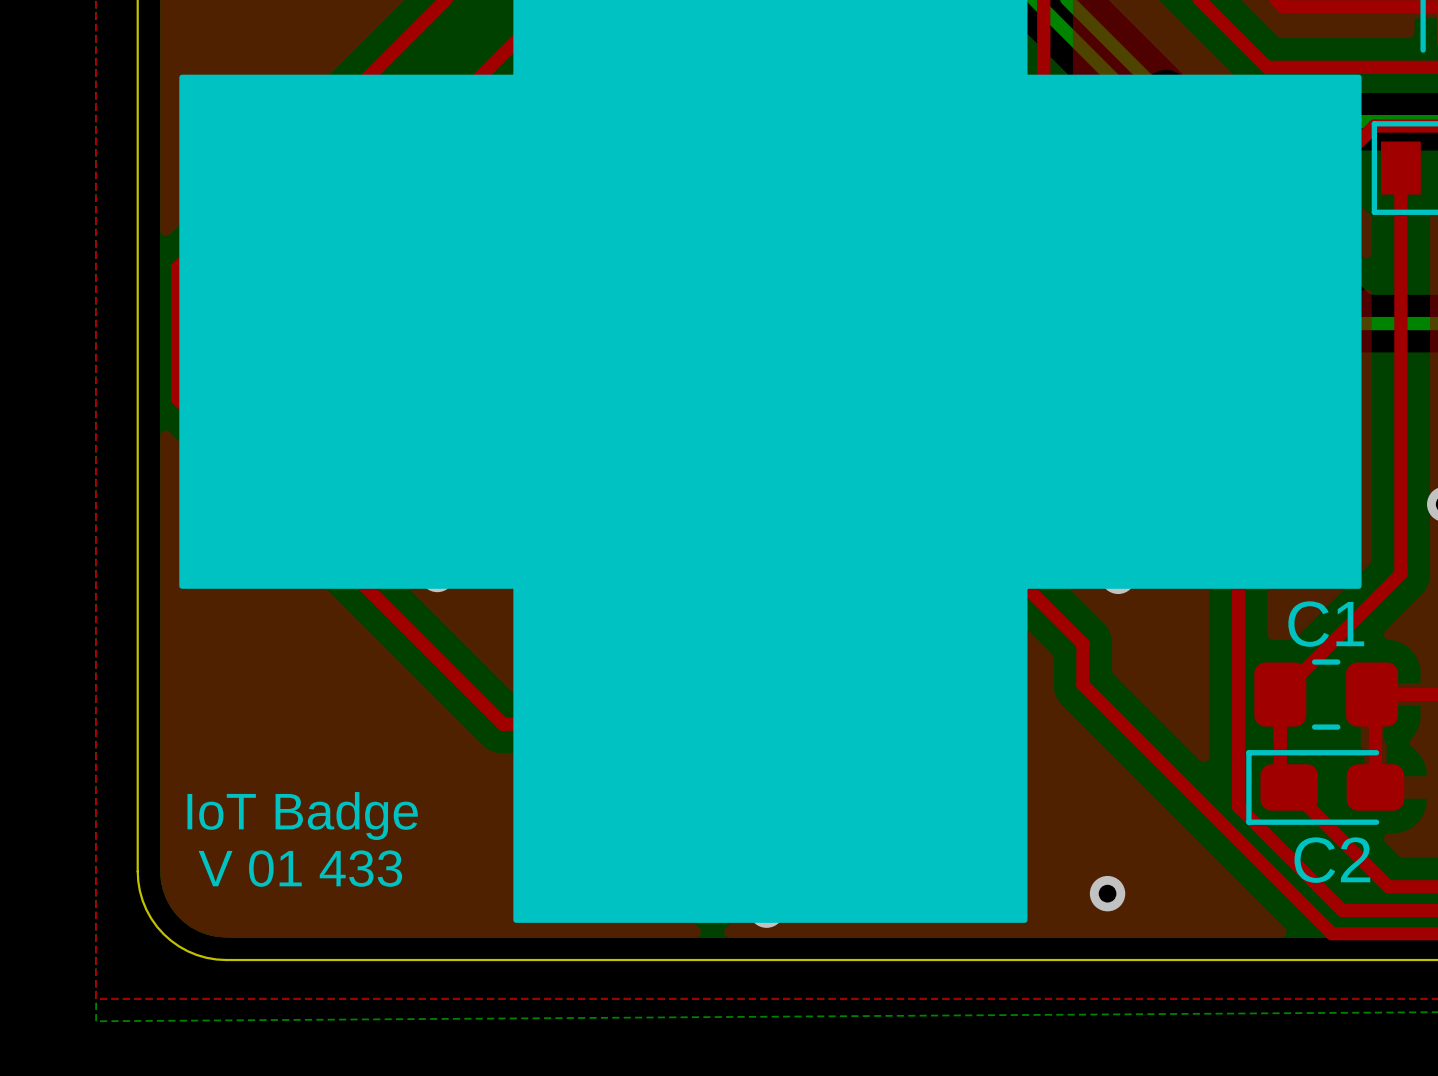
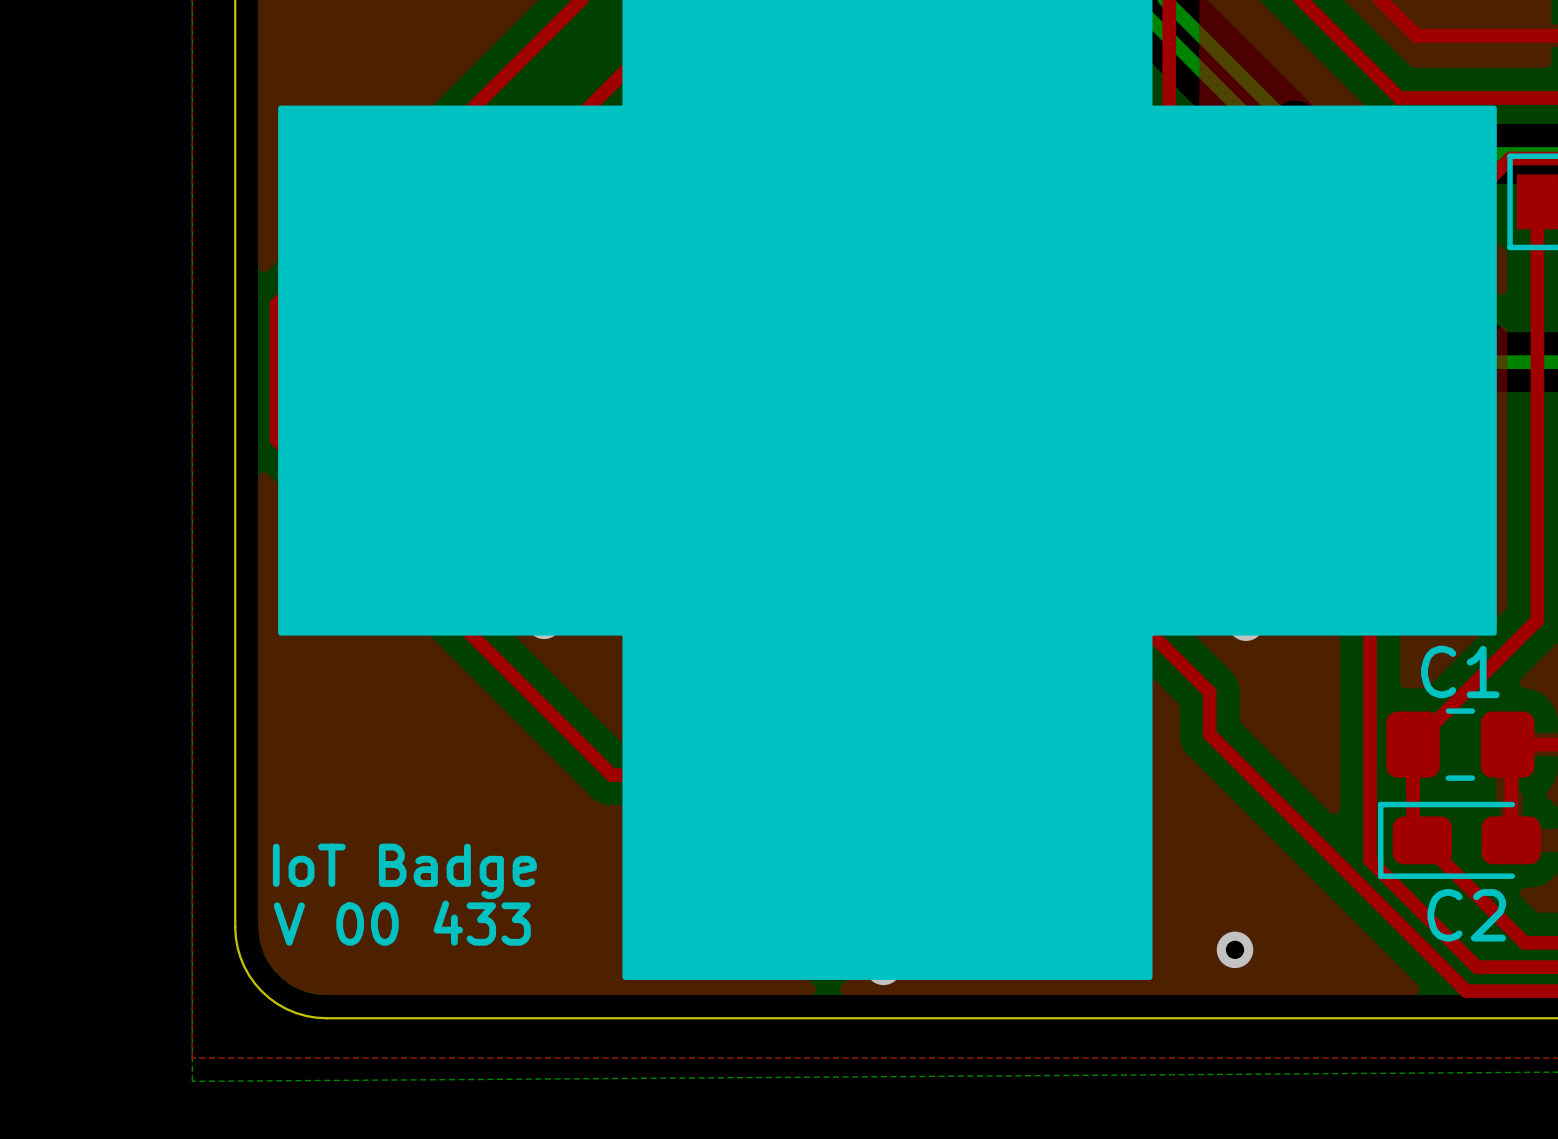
text: V 01 433 (300, 868) -> V 00 433 (402, 923)

